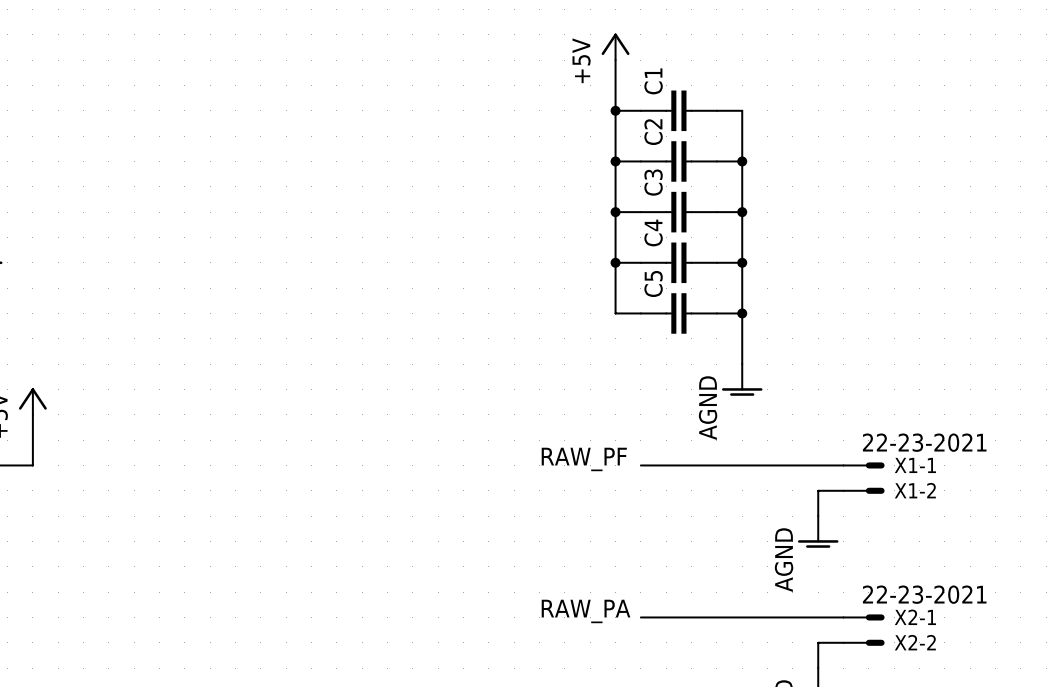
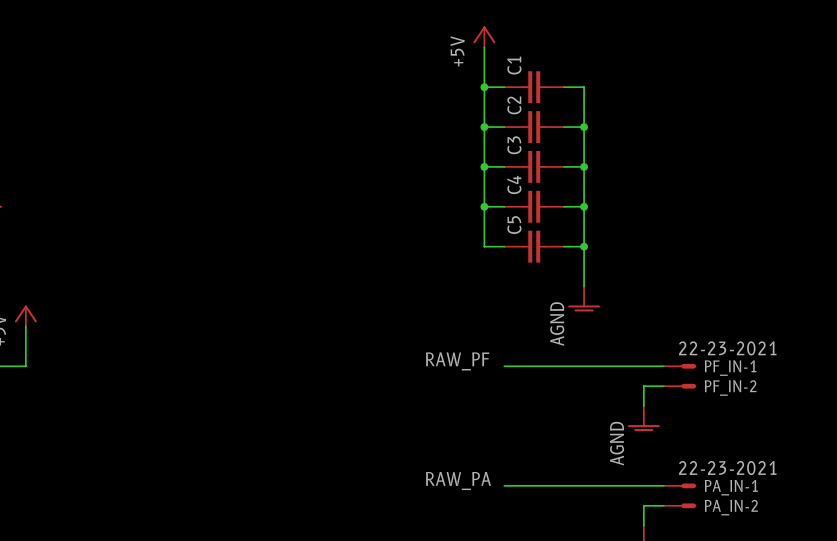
X1-1 name: X1-1 (915, 465) -> PF_IN-1 (730, 368)
X1-2 name: X1-2 (915, 490) -> PF_IN-2 (730, 388)
X2-1 name: X2-1 (915, 617) -> PA_IN-1 (731, 487)
X2-2 name: X2-2 (915, 642) -> PA_IN-2 (731, 507)

